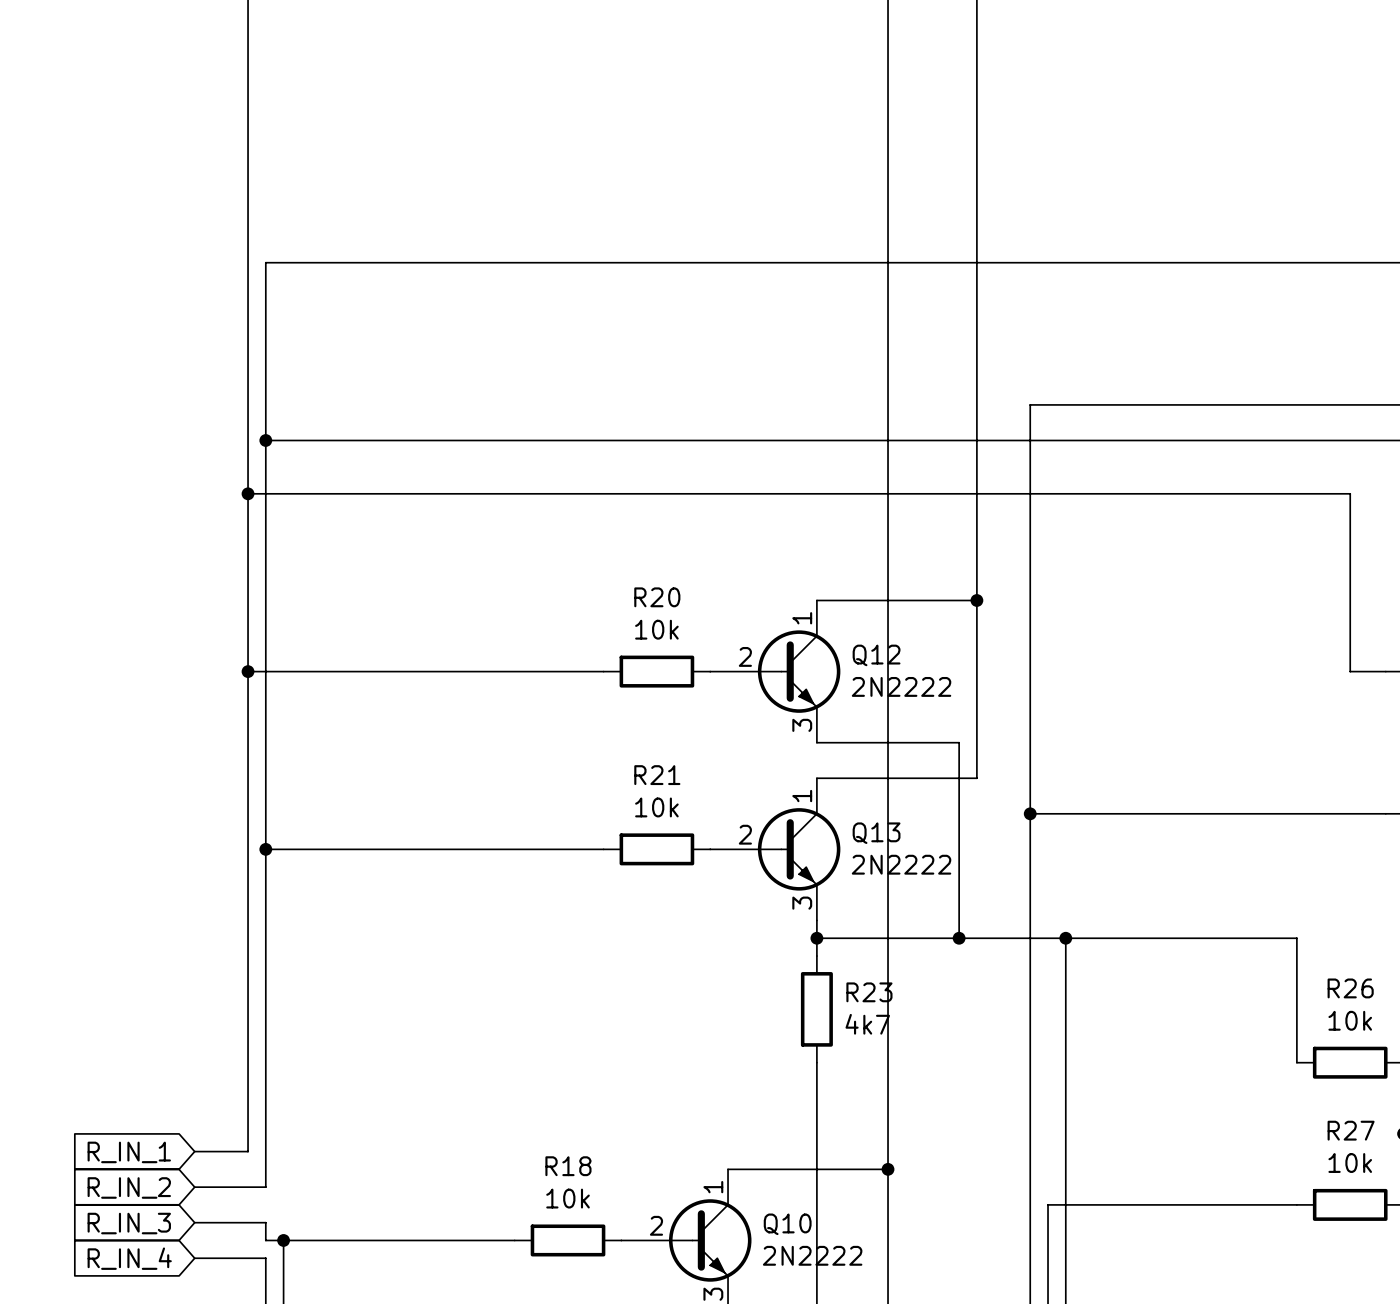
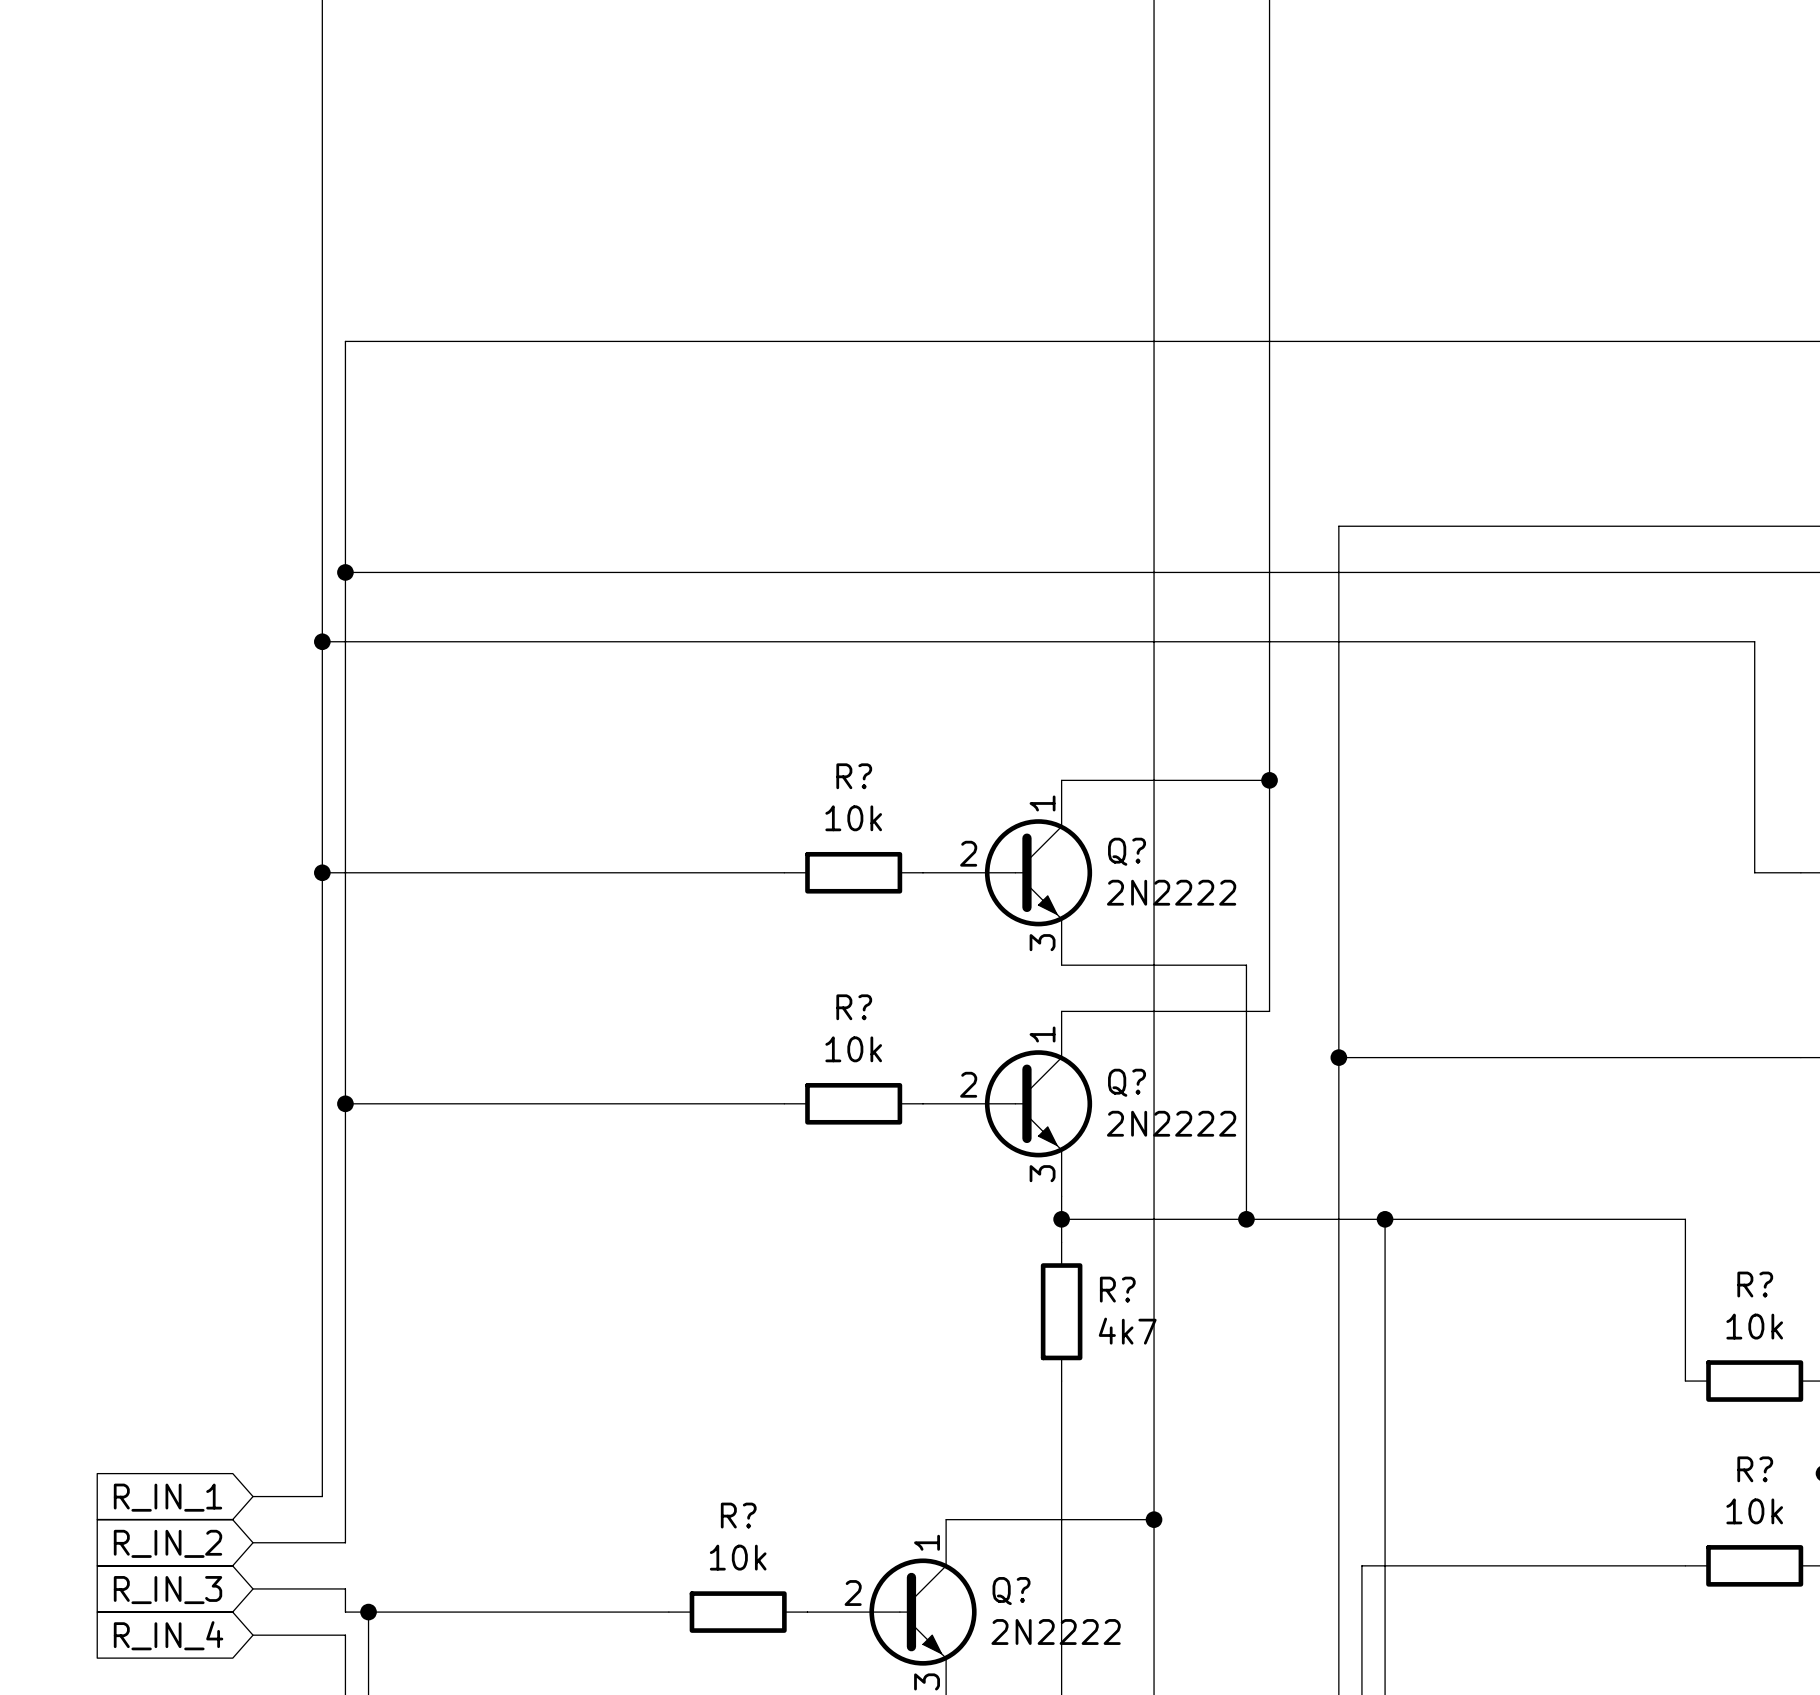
R20 name: R20 (657, 597) -> R? (854, 776)
Q12 name: Q12 (876, 655) -> Q? (1127, 851)
R21 name: R21 (657, 775) -> R? (854, 1007)
Q13 name: Q13 (876, 833) -> Q? (1127, 1082)
R26 name: R26 (1350, 988) -> R? (1755, 1284)
R23 name: R23 (869, 992) -> R? (1117, 1289)
R27 name: R27 (1351, 1130) -> R? (1755, 1469)
R18 name: R18 (568, 1166) -> R? (738, 1515)
Q10 name: Q10 (787, 1224) -> Q? (1011, 1591)

